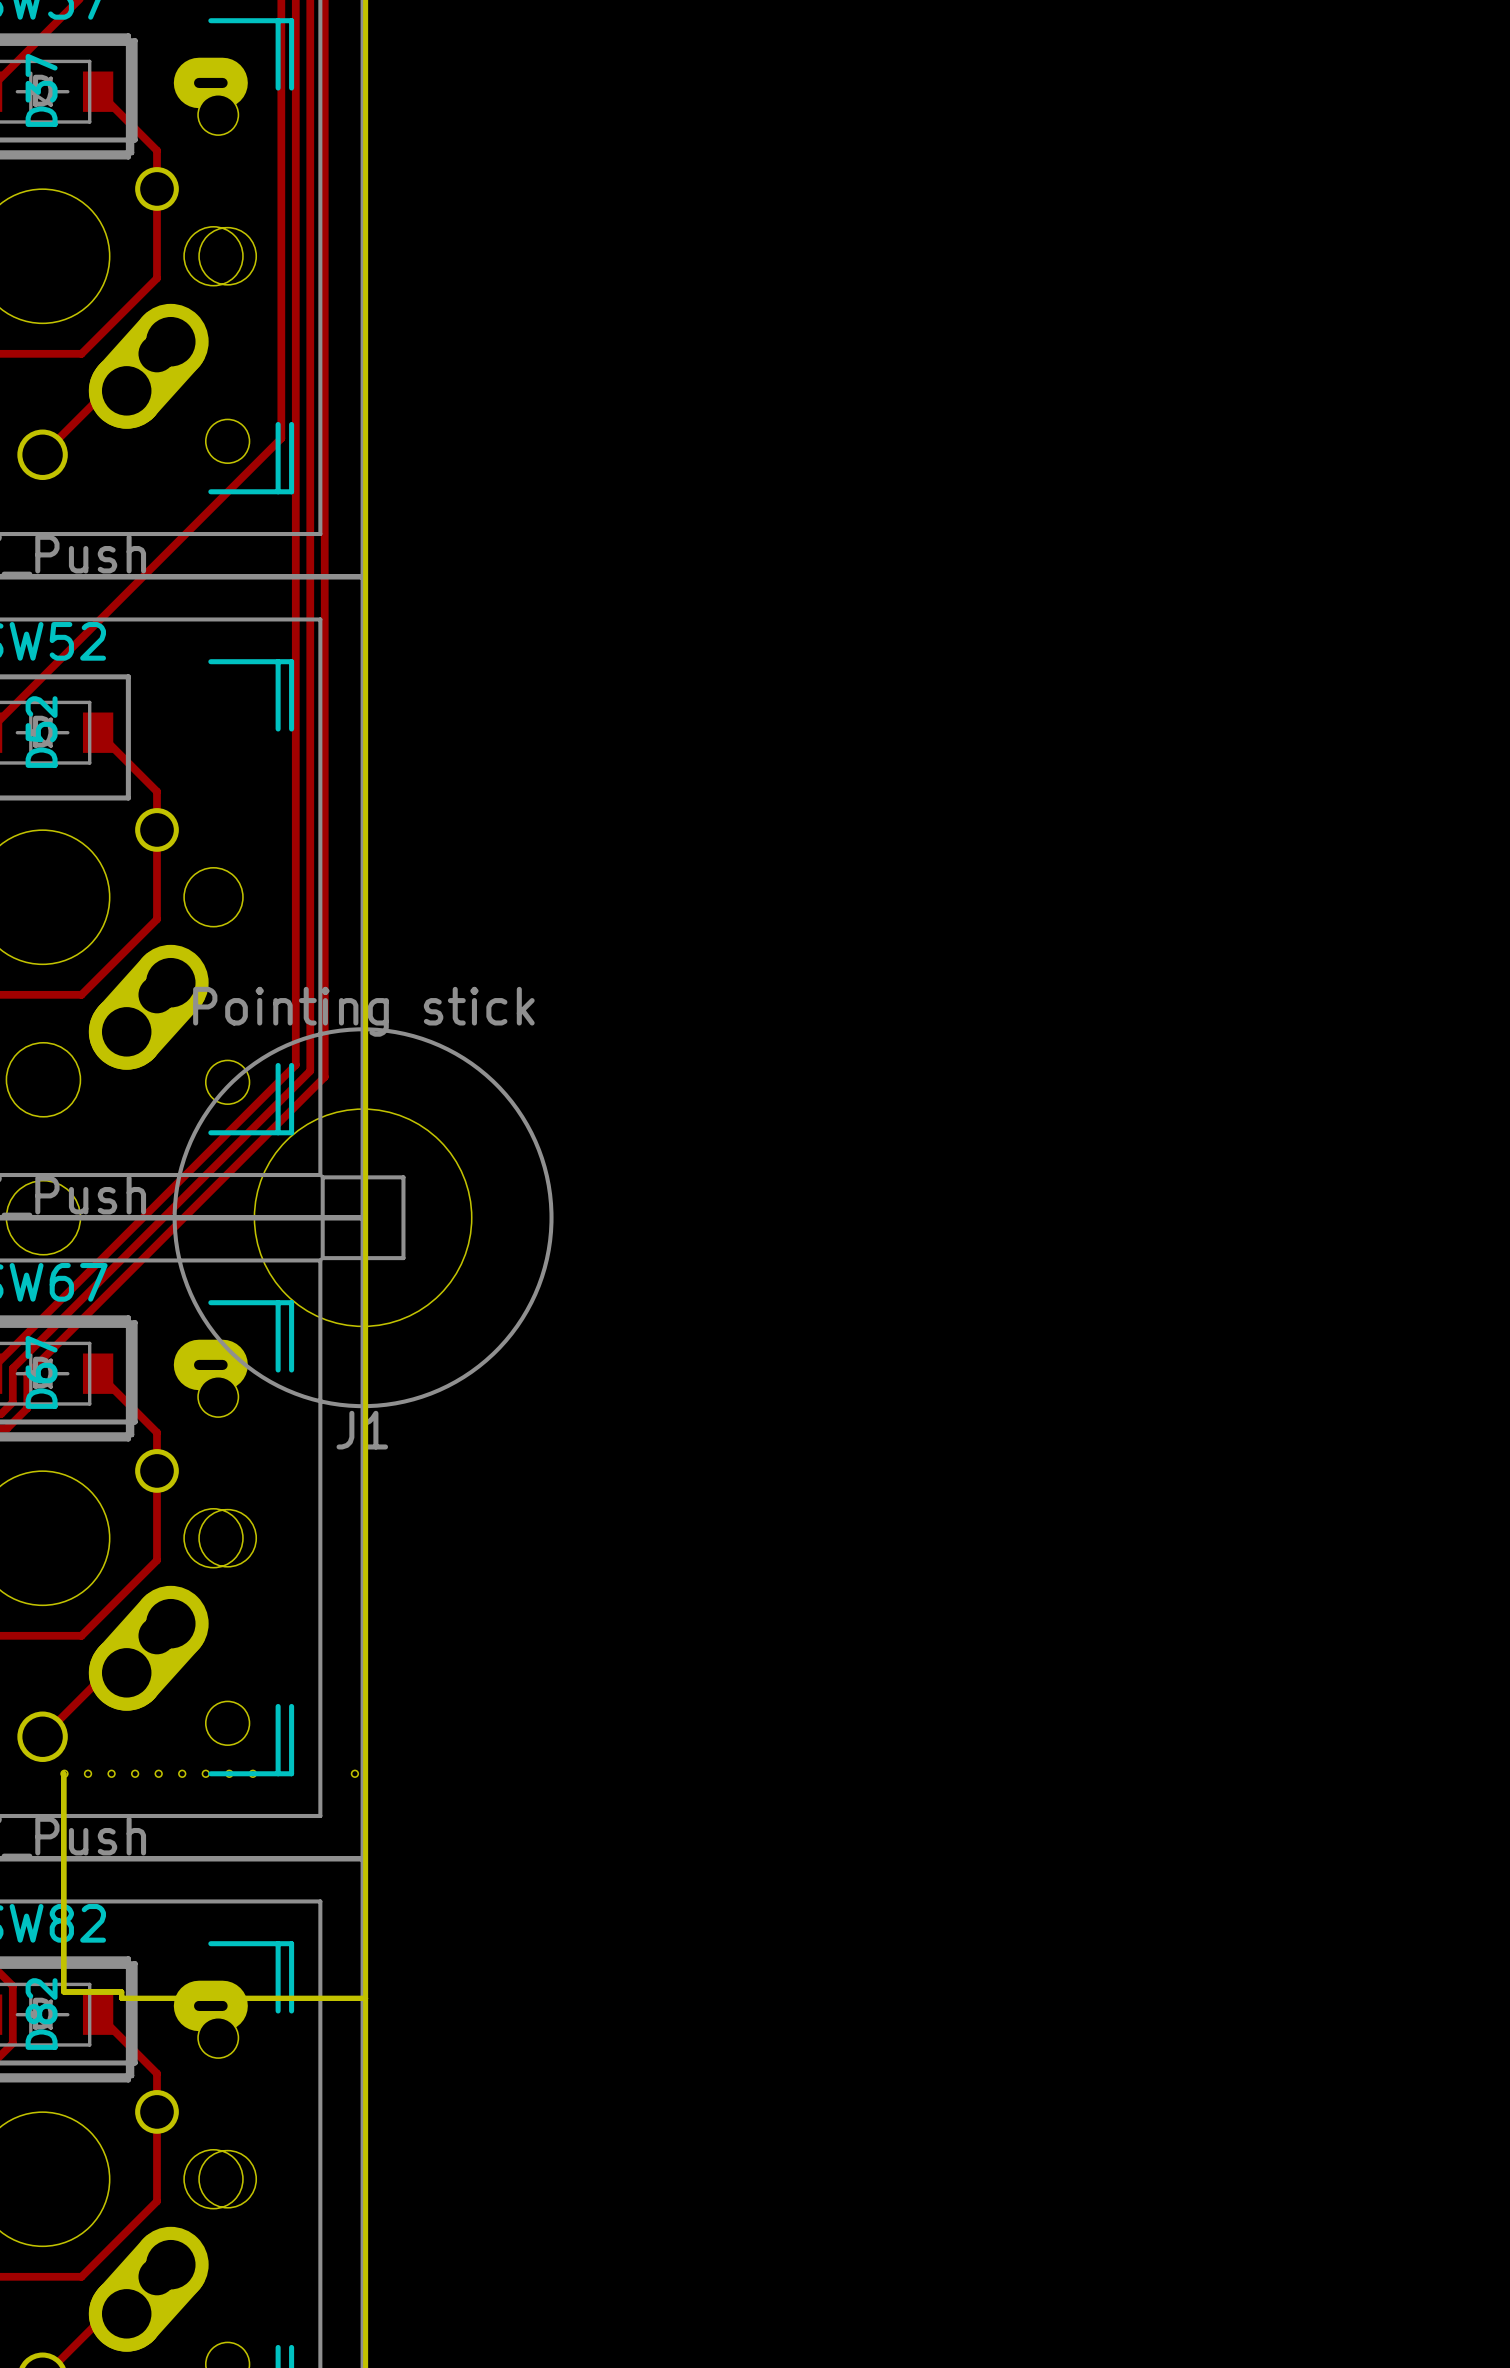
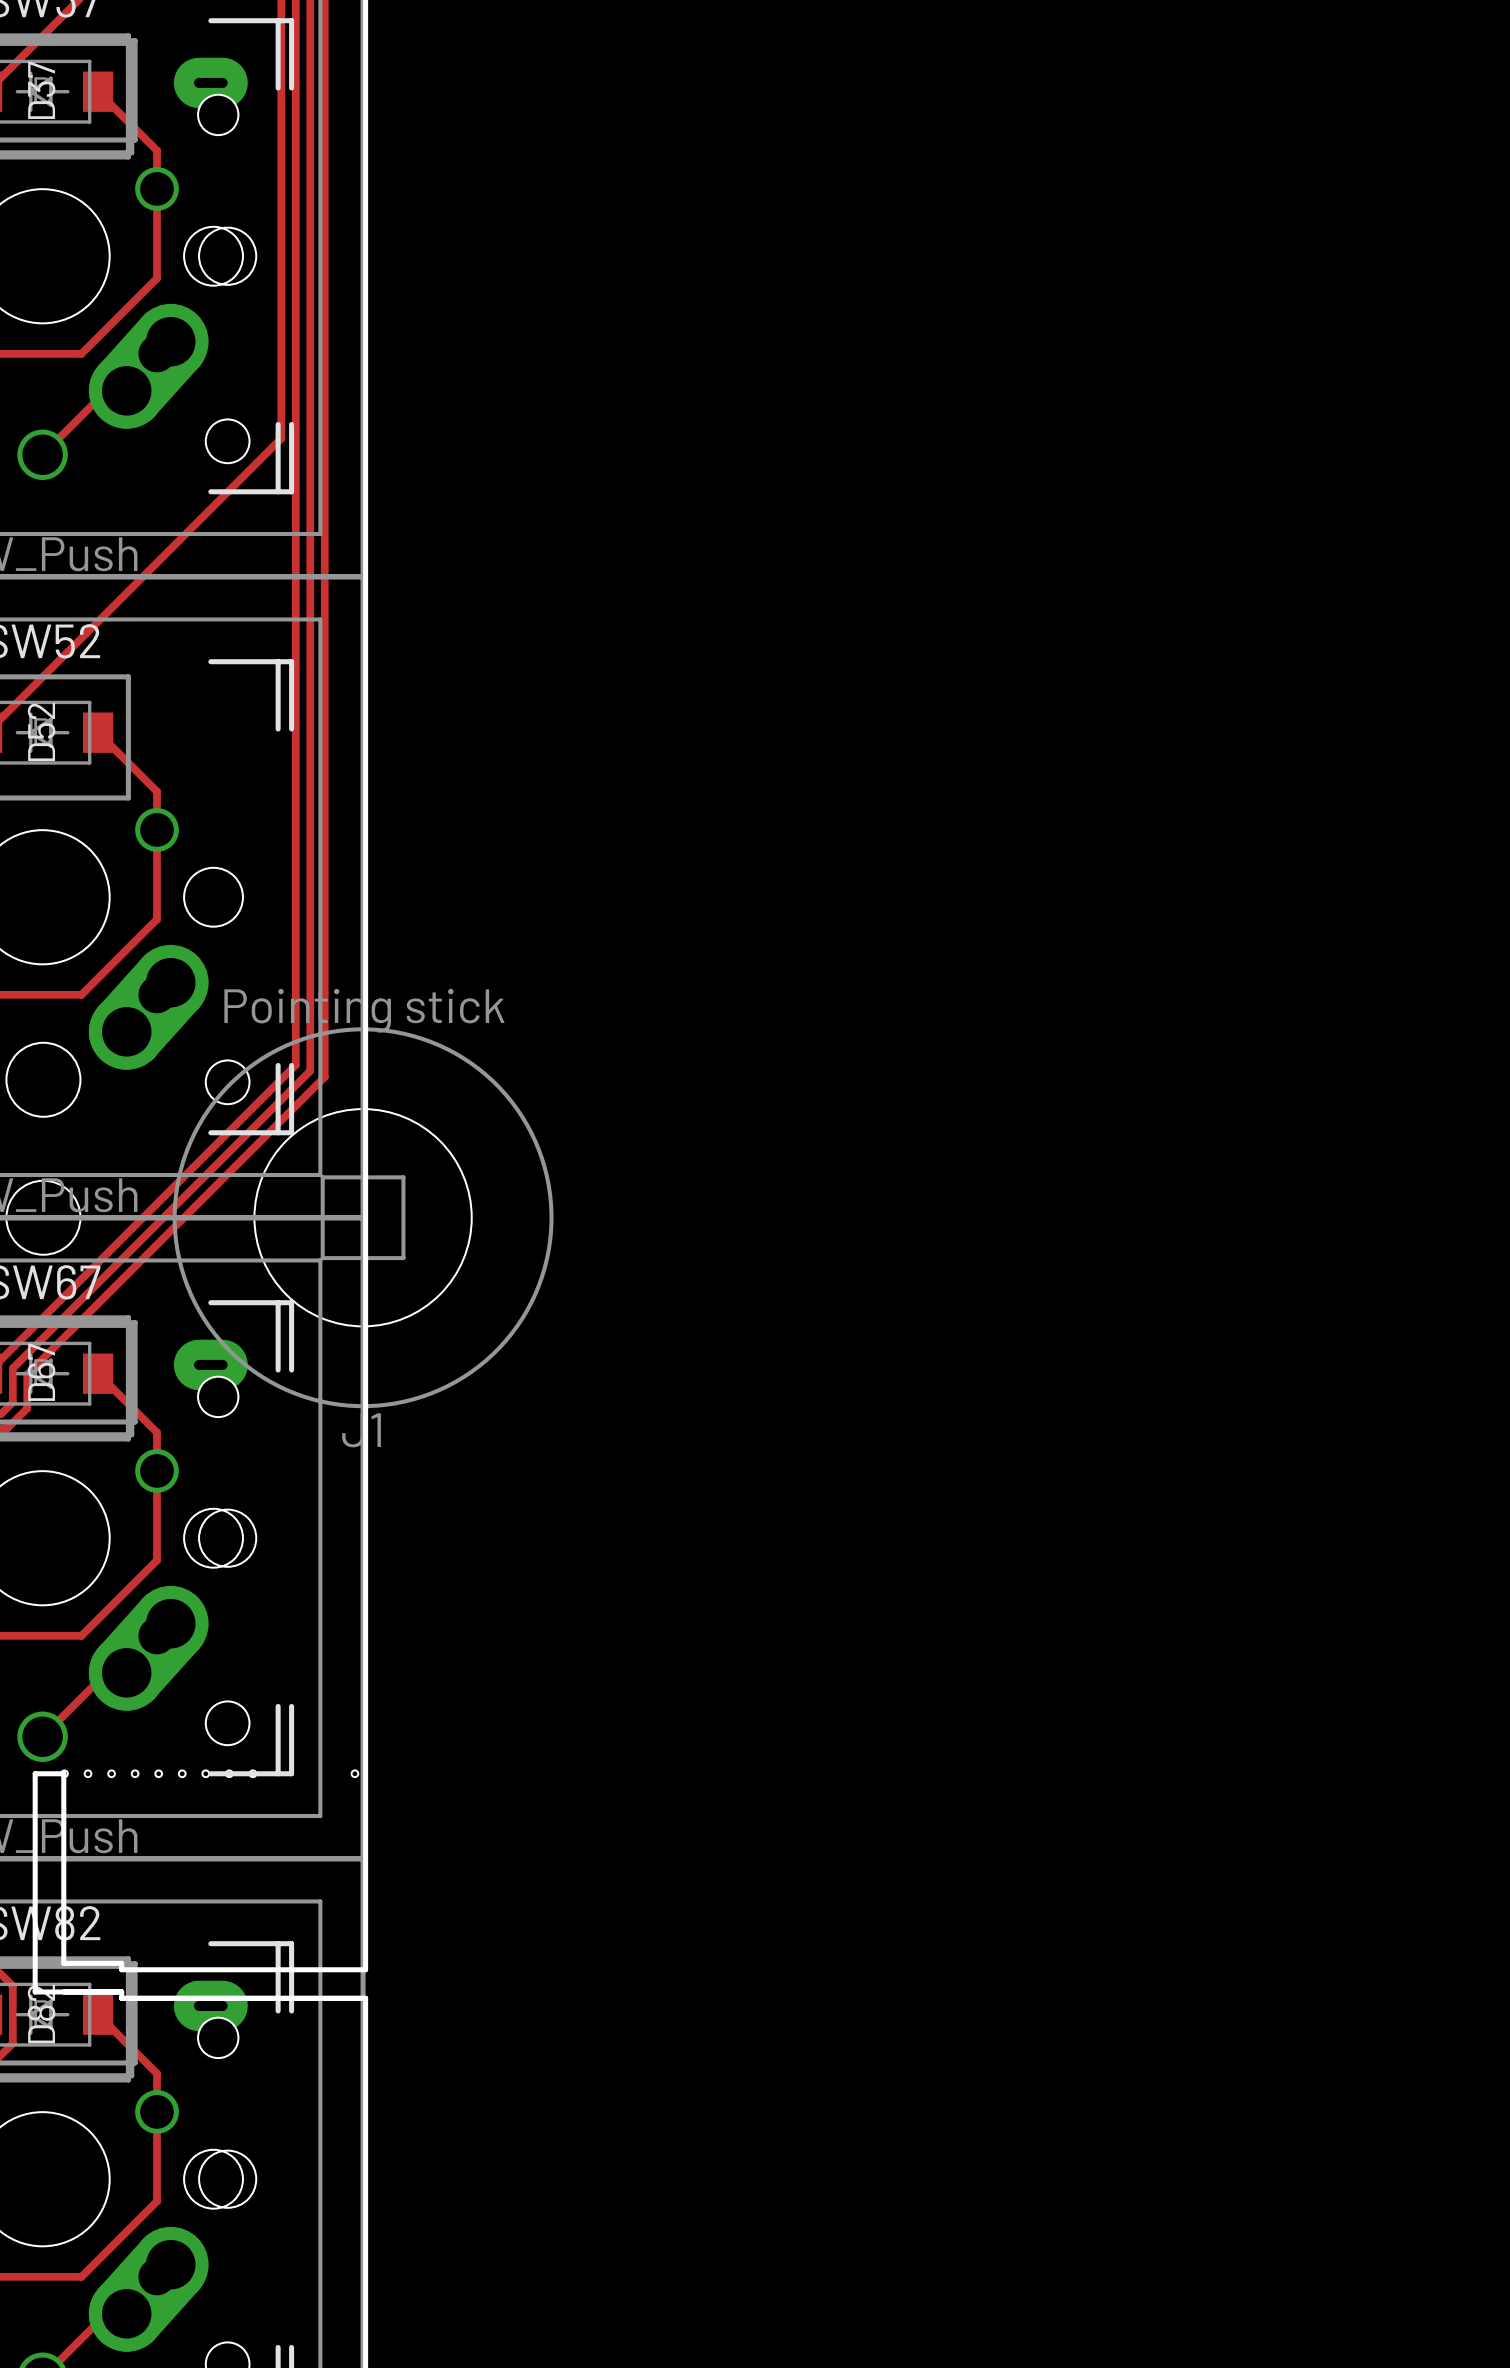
board edge: (63, 1963) (63, 1991) -> (63, 1773) (35, 1773) (35, 1991) (63, 1991)
board edge: (365, 1969) (365, 1998) -> (365, 1969) (121, 1969) (121, 1963) (63, 1963)

